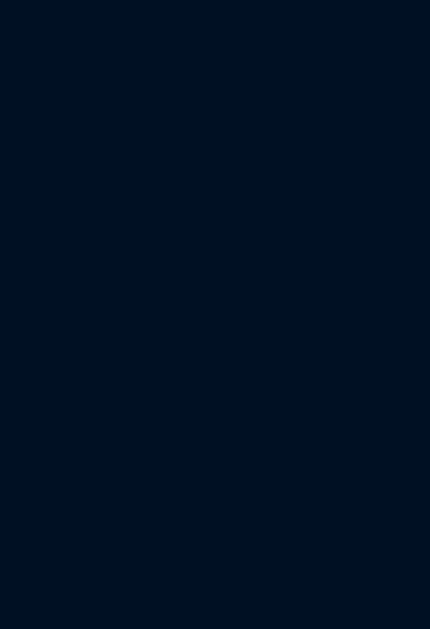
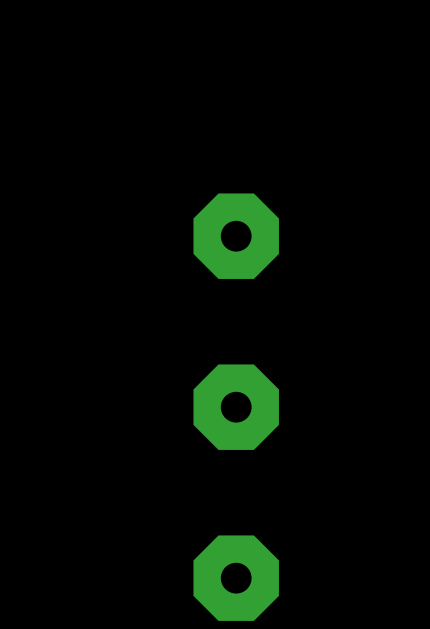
part: none -> (236, 236)
part: none -> (236, 407)
part: none -> (236, 578)

